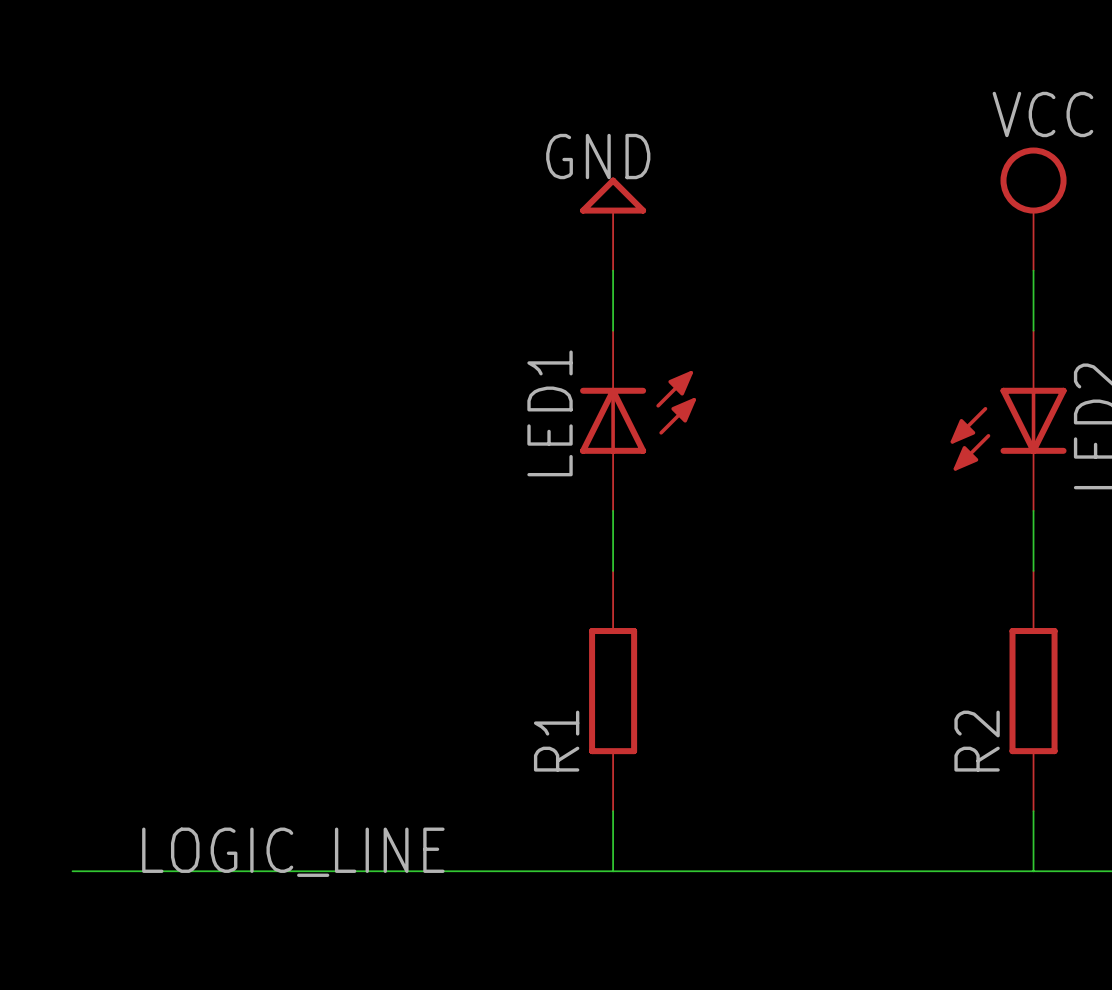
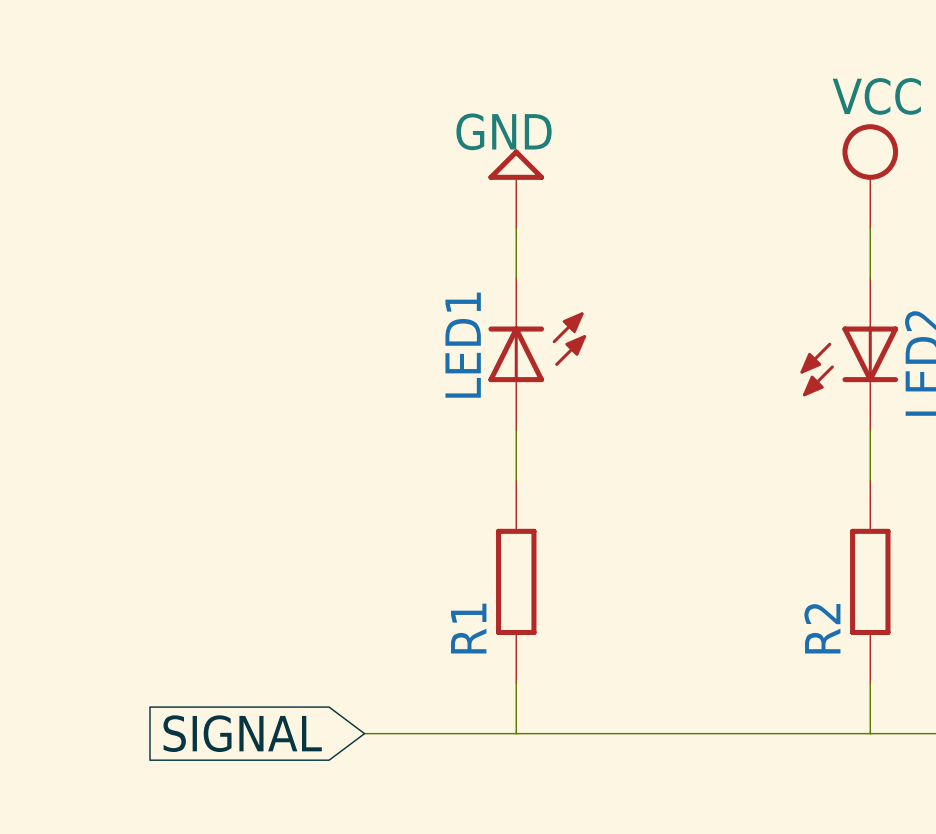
label: LOGIC_LINE (293, 852) -> none
wire: (72, 871) (432, 871) -> none
global label: none -> SIGNAL (242, 733)

